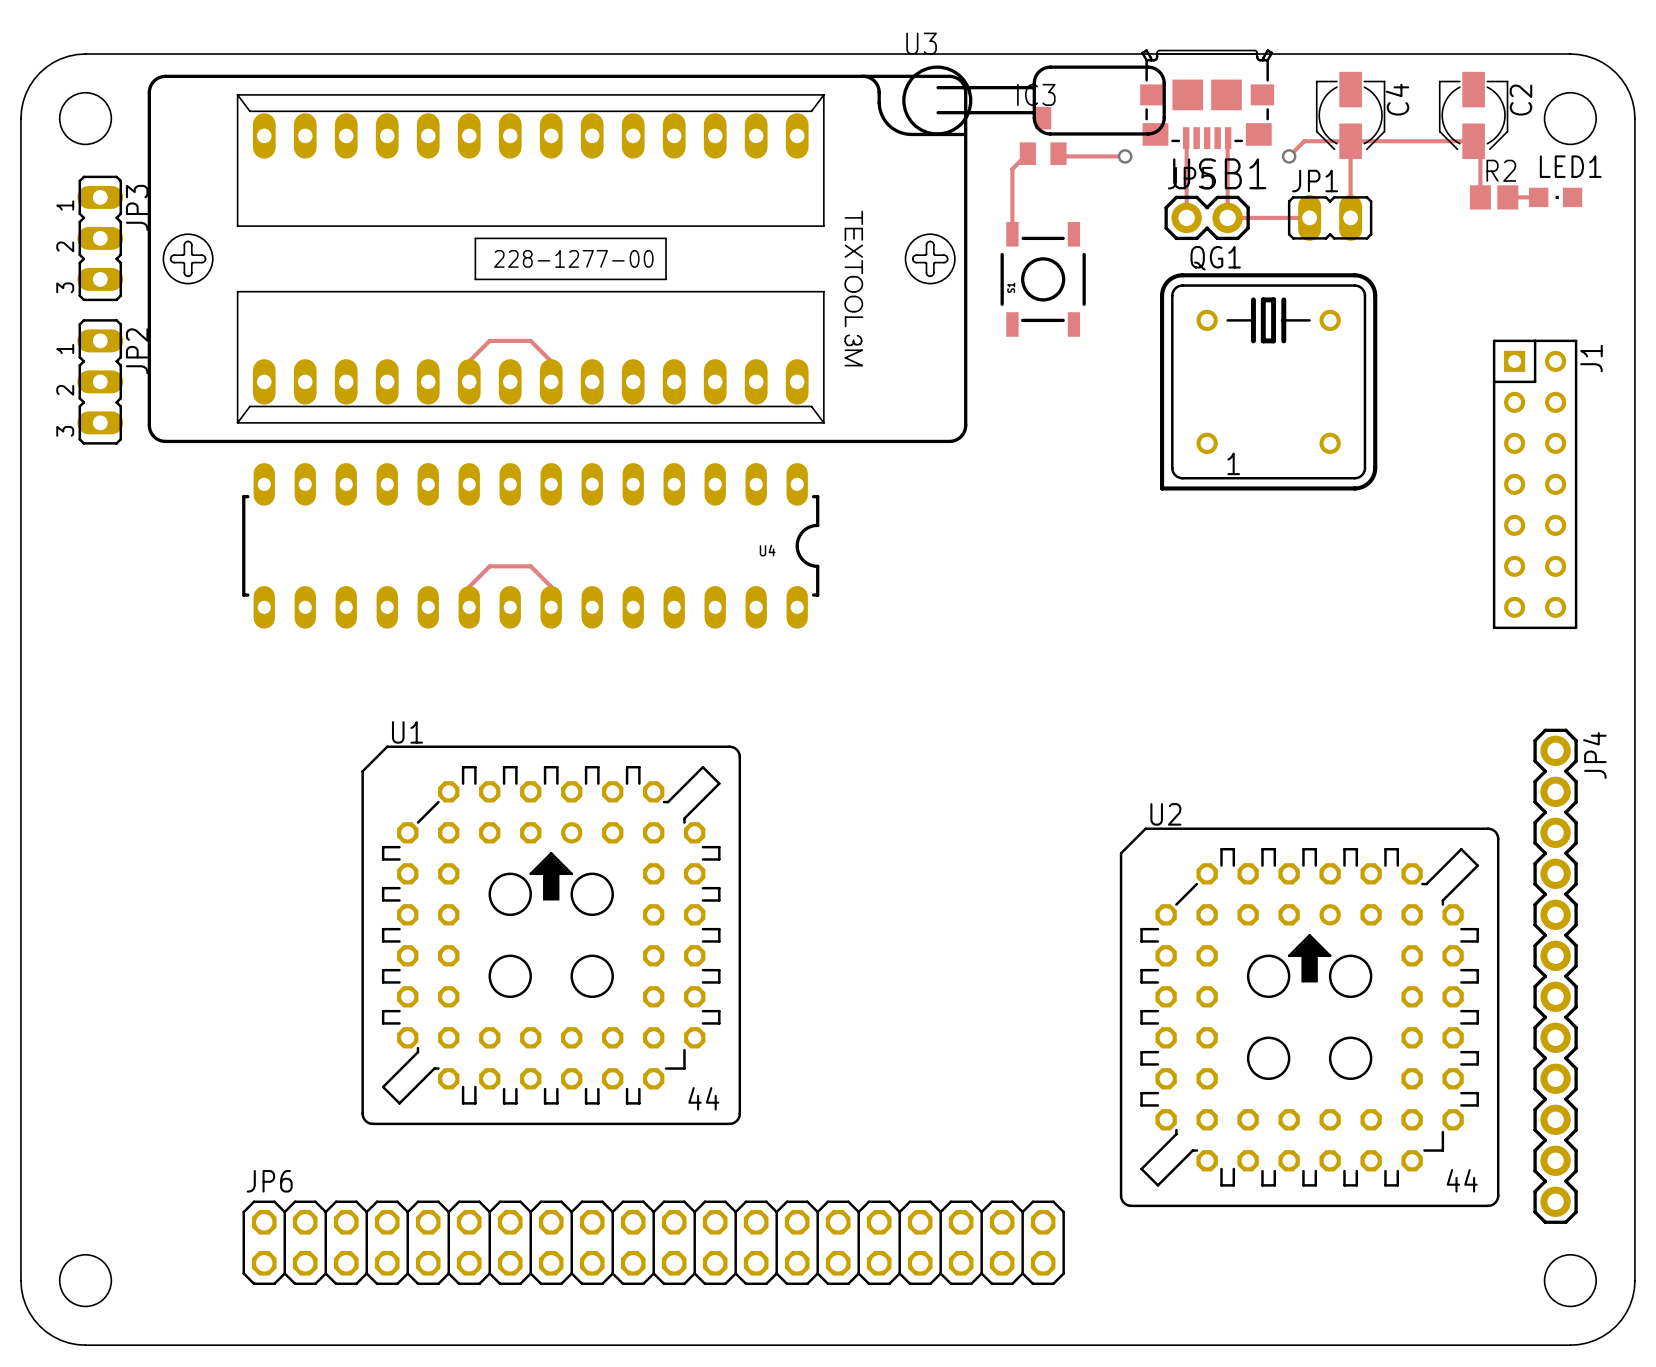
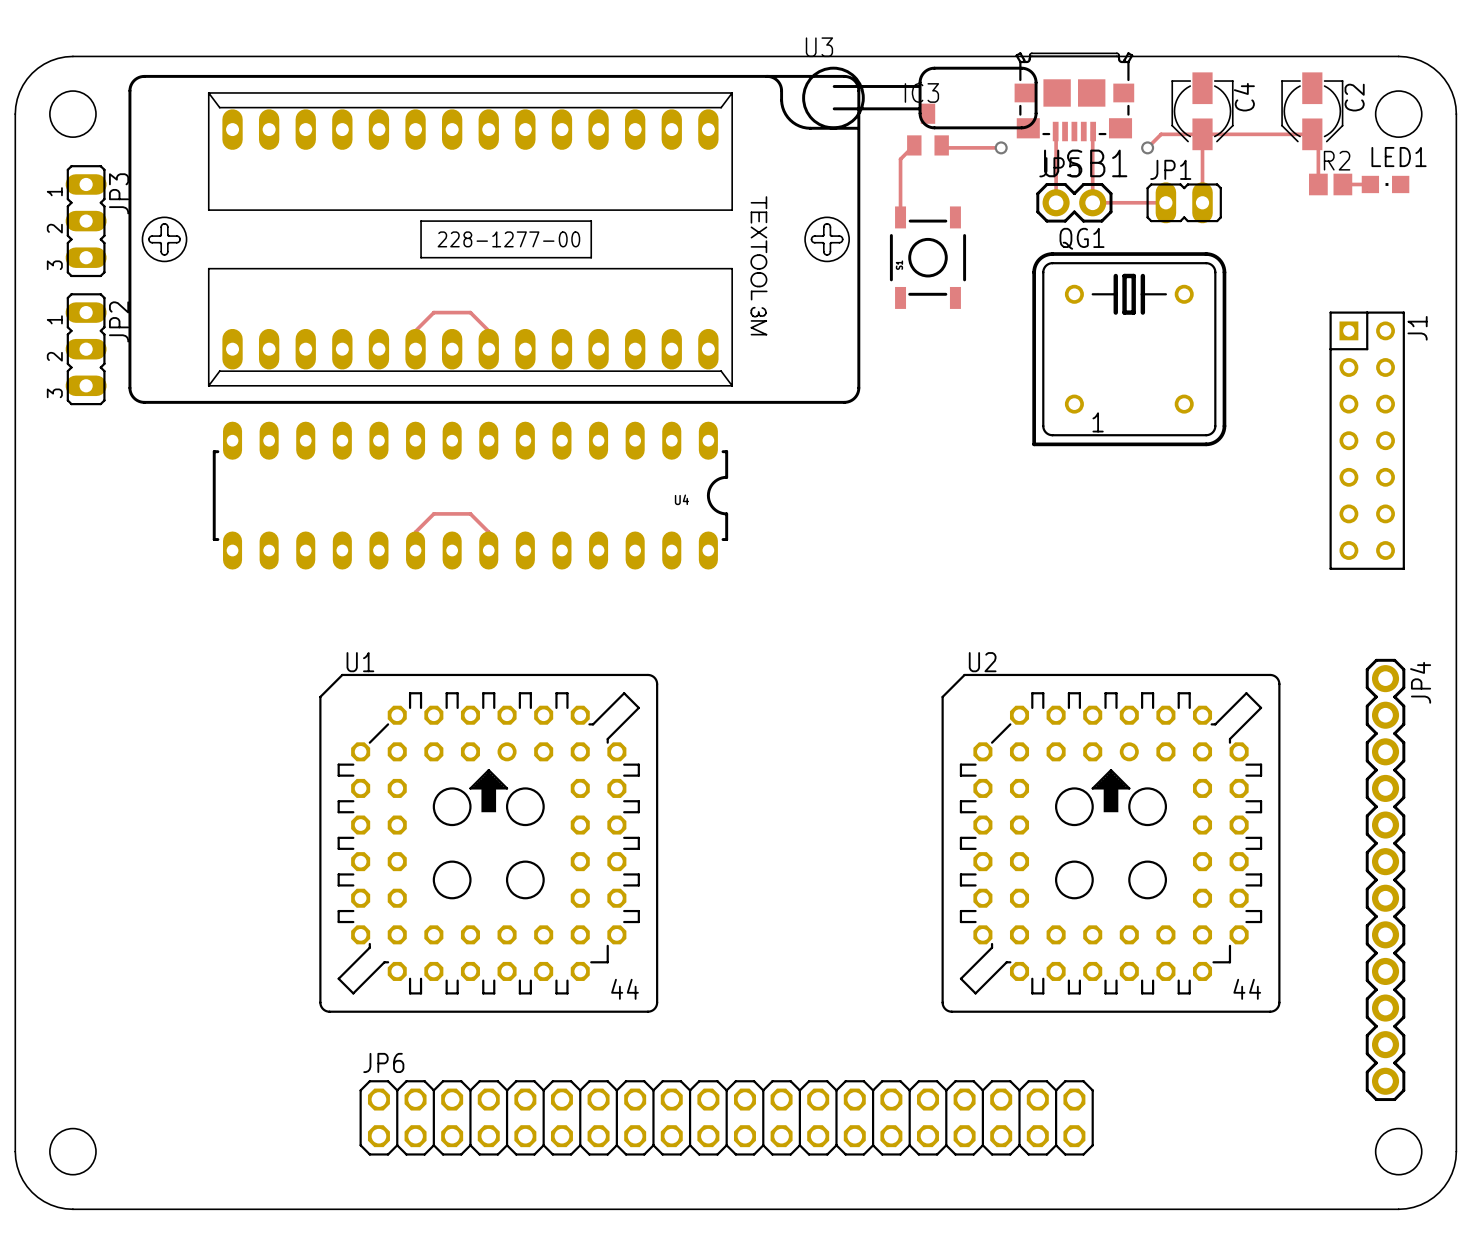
U2 position: (1309, 1017) -> (1111, 843)
JP6 position: (653, 1242) -> (726, 1117)

